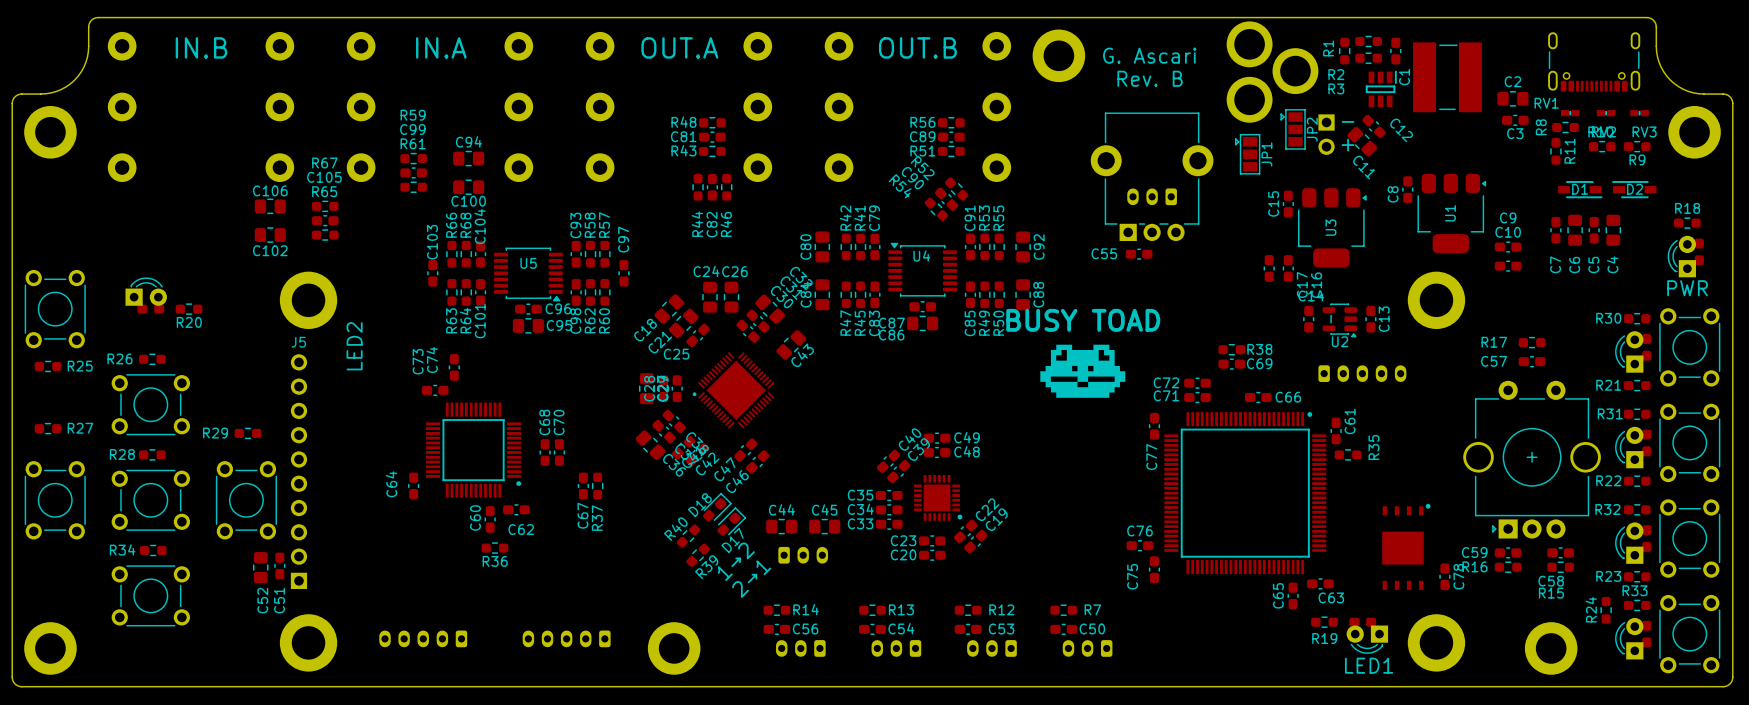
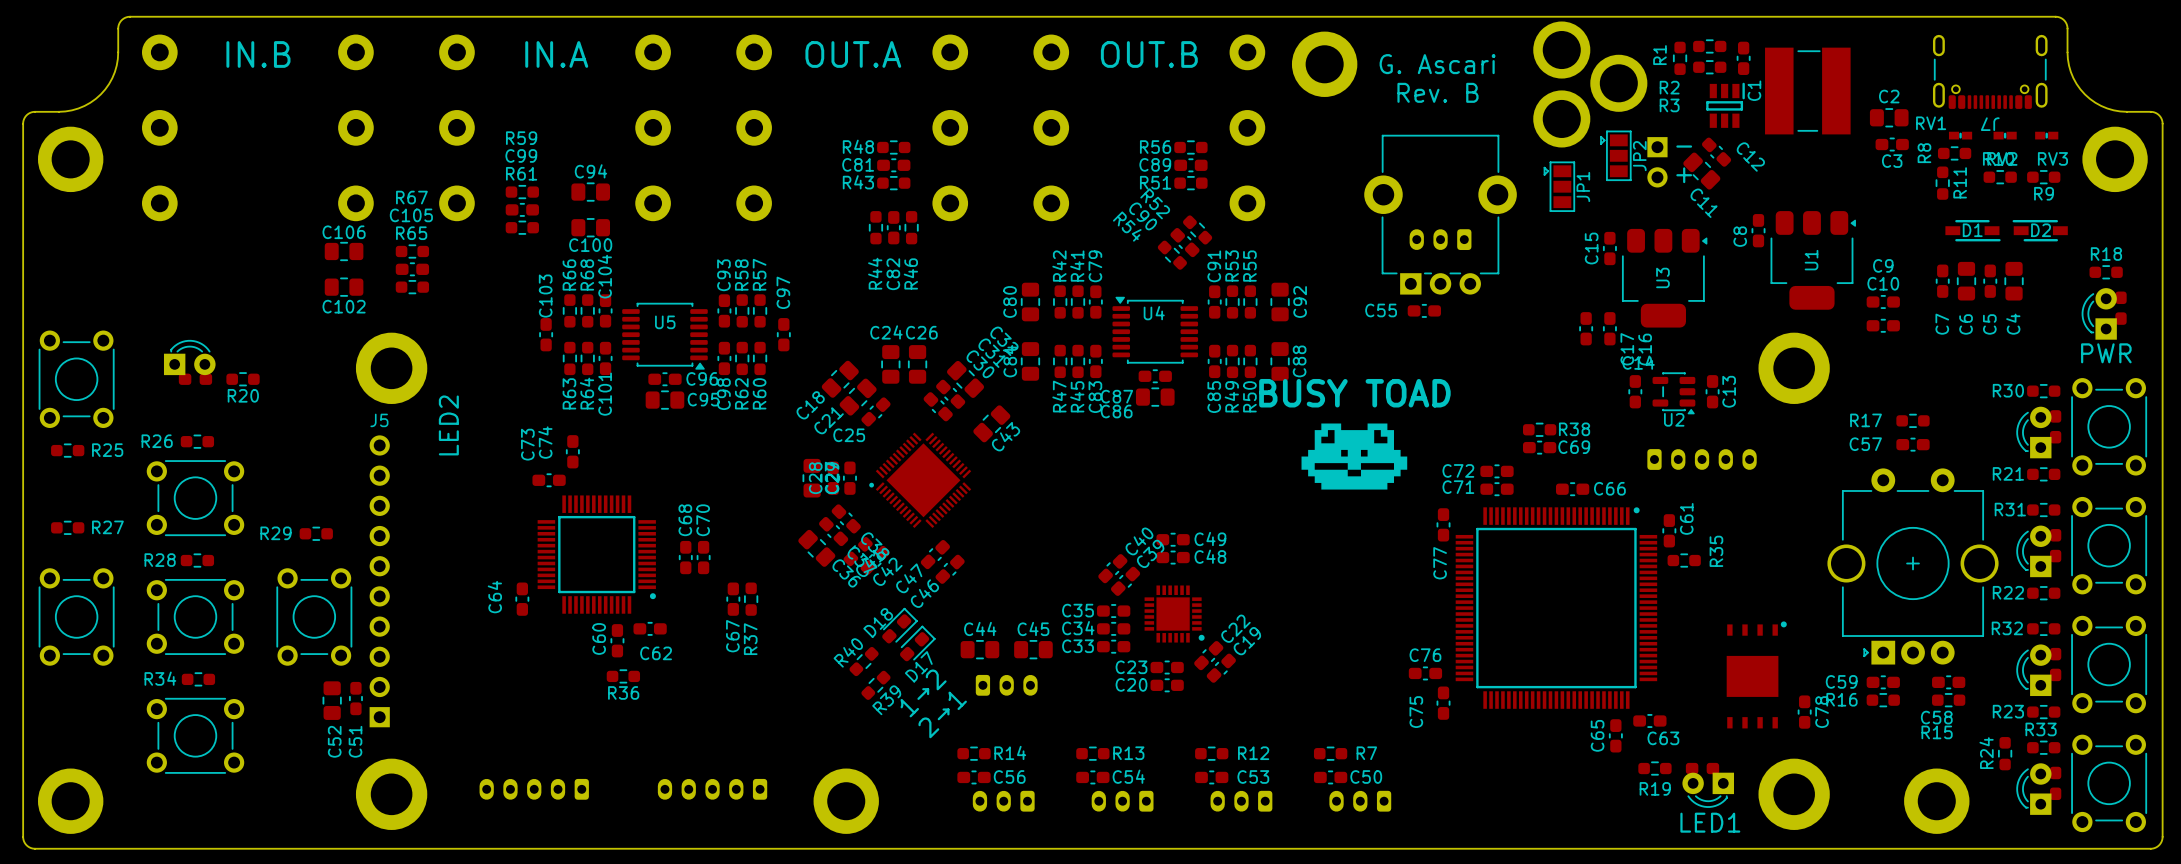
J7 name: none -> J7 (1990, 124)

